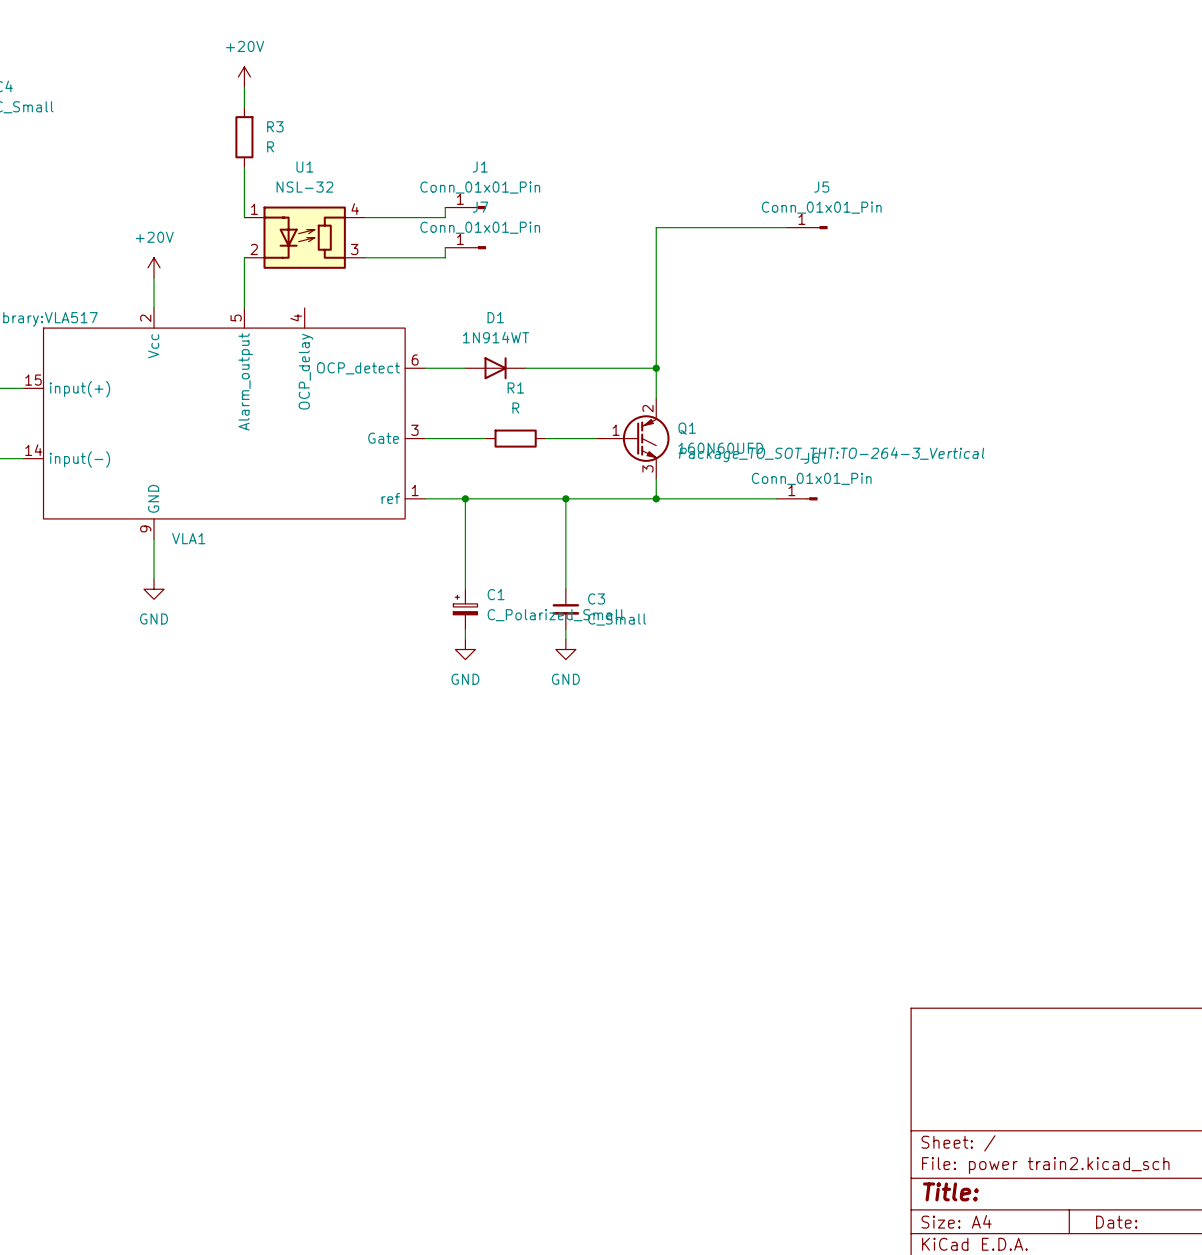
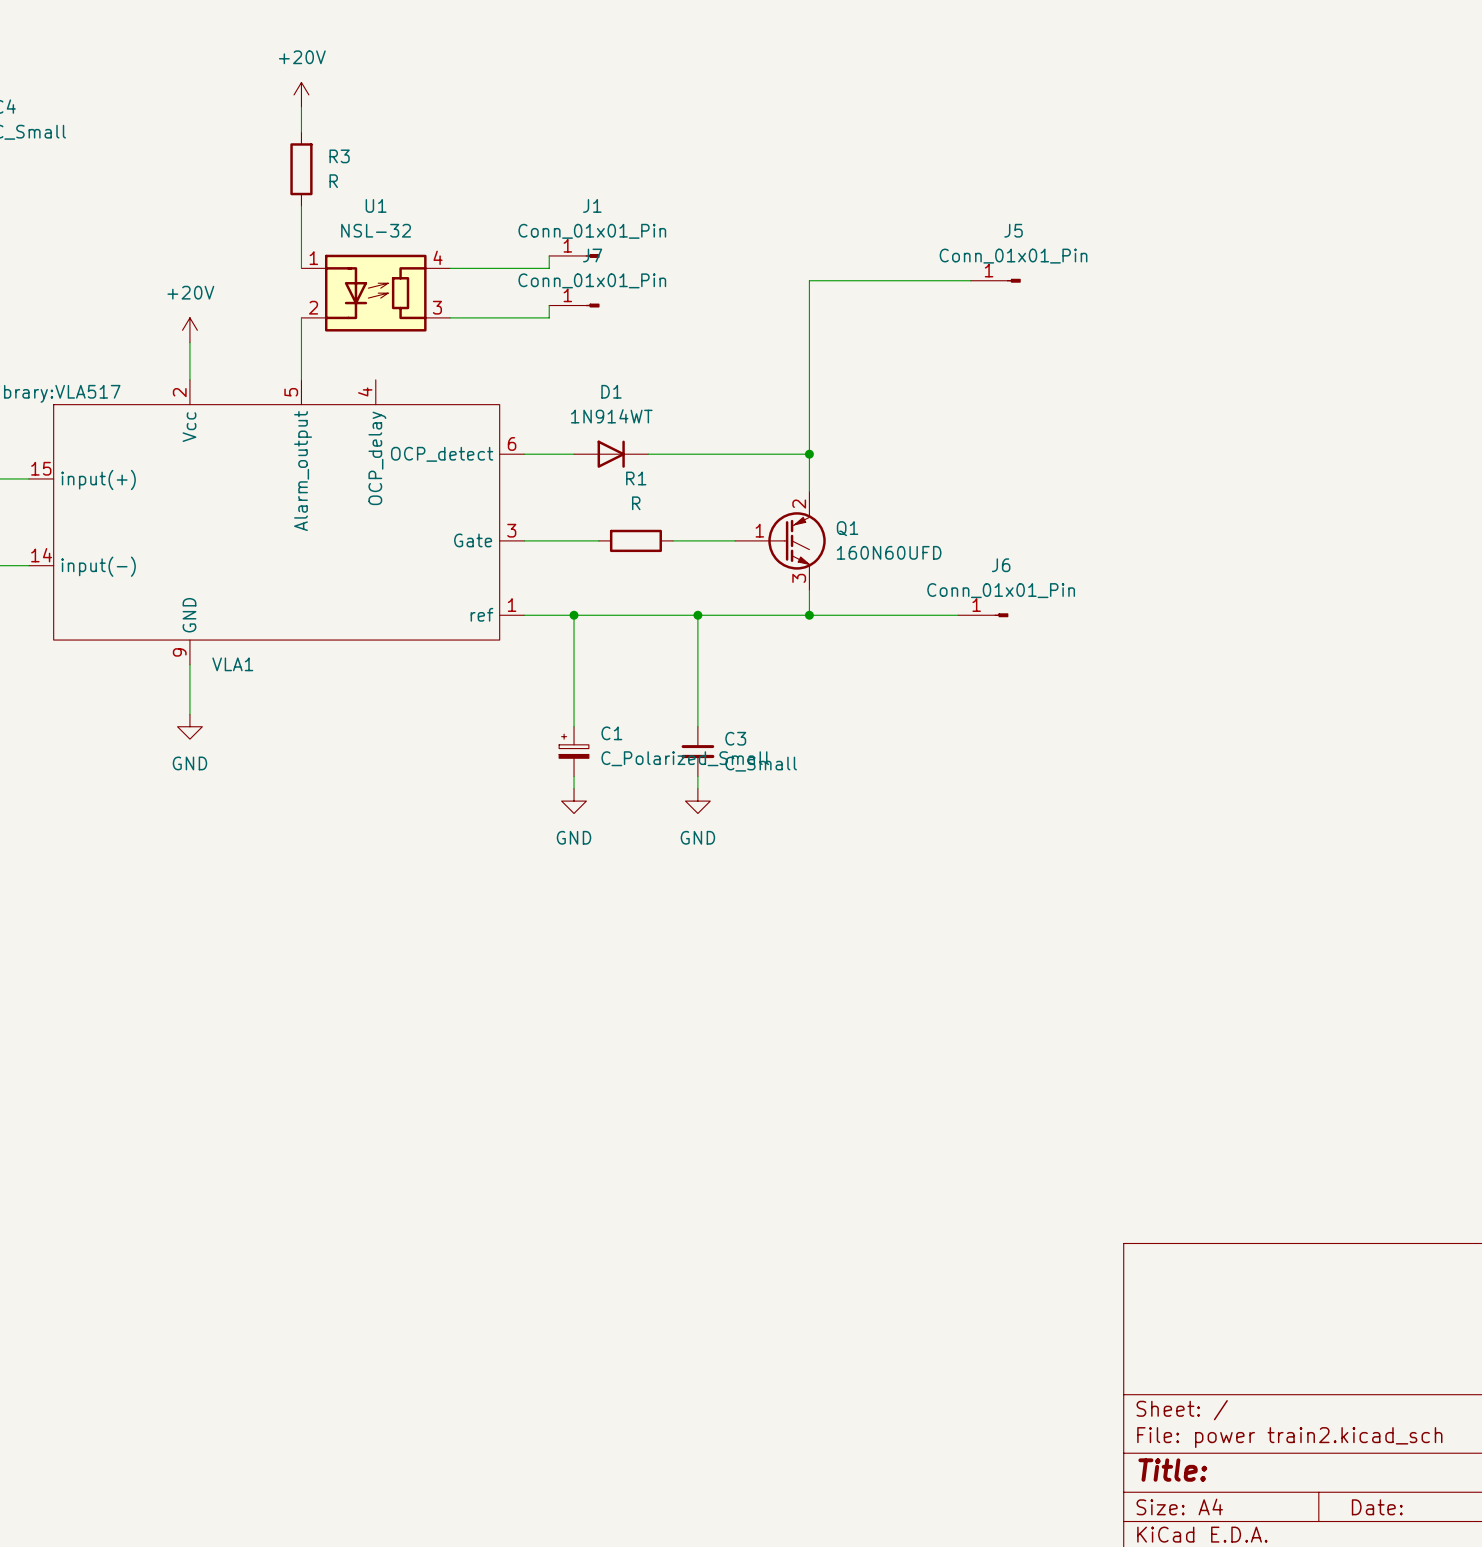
Q1 text: Package_TO_SOT_THT:TO-264-3_Vertical (831, 454) -> none

